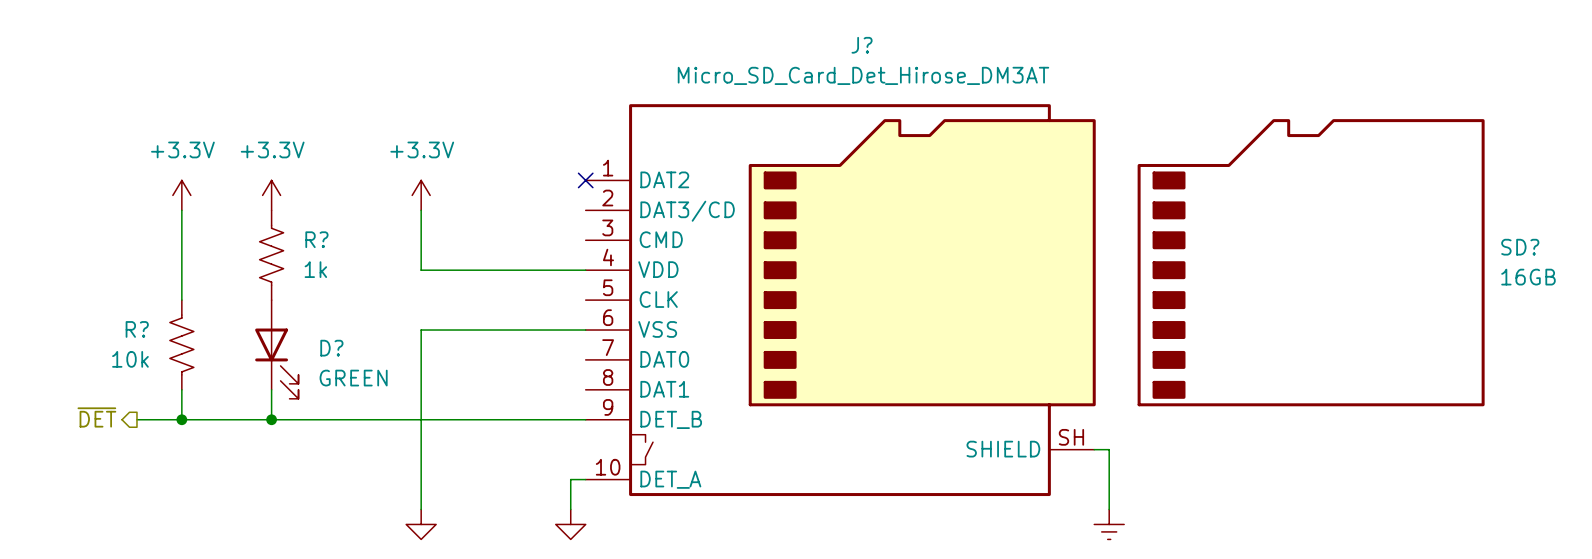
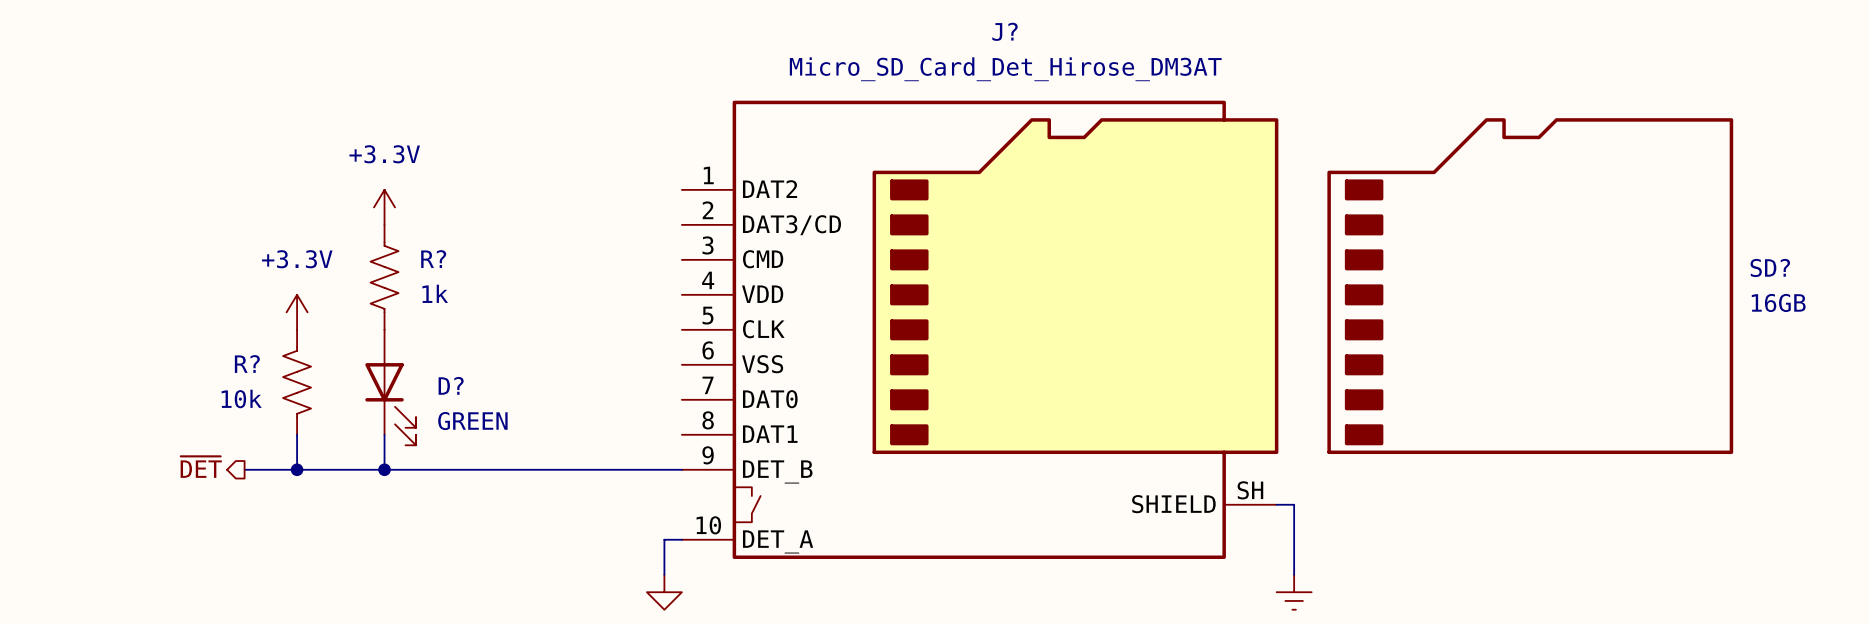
no-connect mark: (585, 180) -> none
power symbol: +3.3V (181, 195) -> none
power symbol: +3.3V (271, 195) -> none
power symbol: none -> +3.3V (384, 207)
power symbol: +3.3V (421, 195) -> none
wire: (181, 210) (181, 300) -> none
wire: (421, 210) (421, 270) (585, 270) -> none
R? position: (271, 255) -> (384, 277)
power symbol: none -> +3.3V (297, 312)
wire: (585, 330) (421, 330) (421, 509) -> none
R? position: (181, 344) -> (297, 382)
D? position: (276, 349) -> (390, 387)
wire: (181, 389) (181, 419) -> (384, 434) (384, 469)
wire: (271, 389) (271, 419) -> (297, 434) (297, 469)
hierarchical label position: ~{DET} (96, 417) -> ~{DET} (201, 467)
wire: (136, 419) (211, 419) -> none
junction: (181, 419) -> none
junction position: (271, 419) -> (297, 469)
junction: none -> (384, 469)
power symbol: (421, 524) -> none

